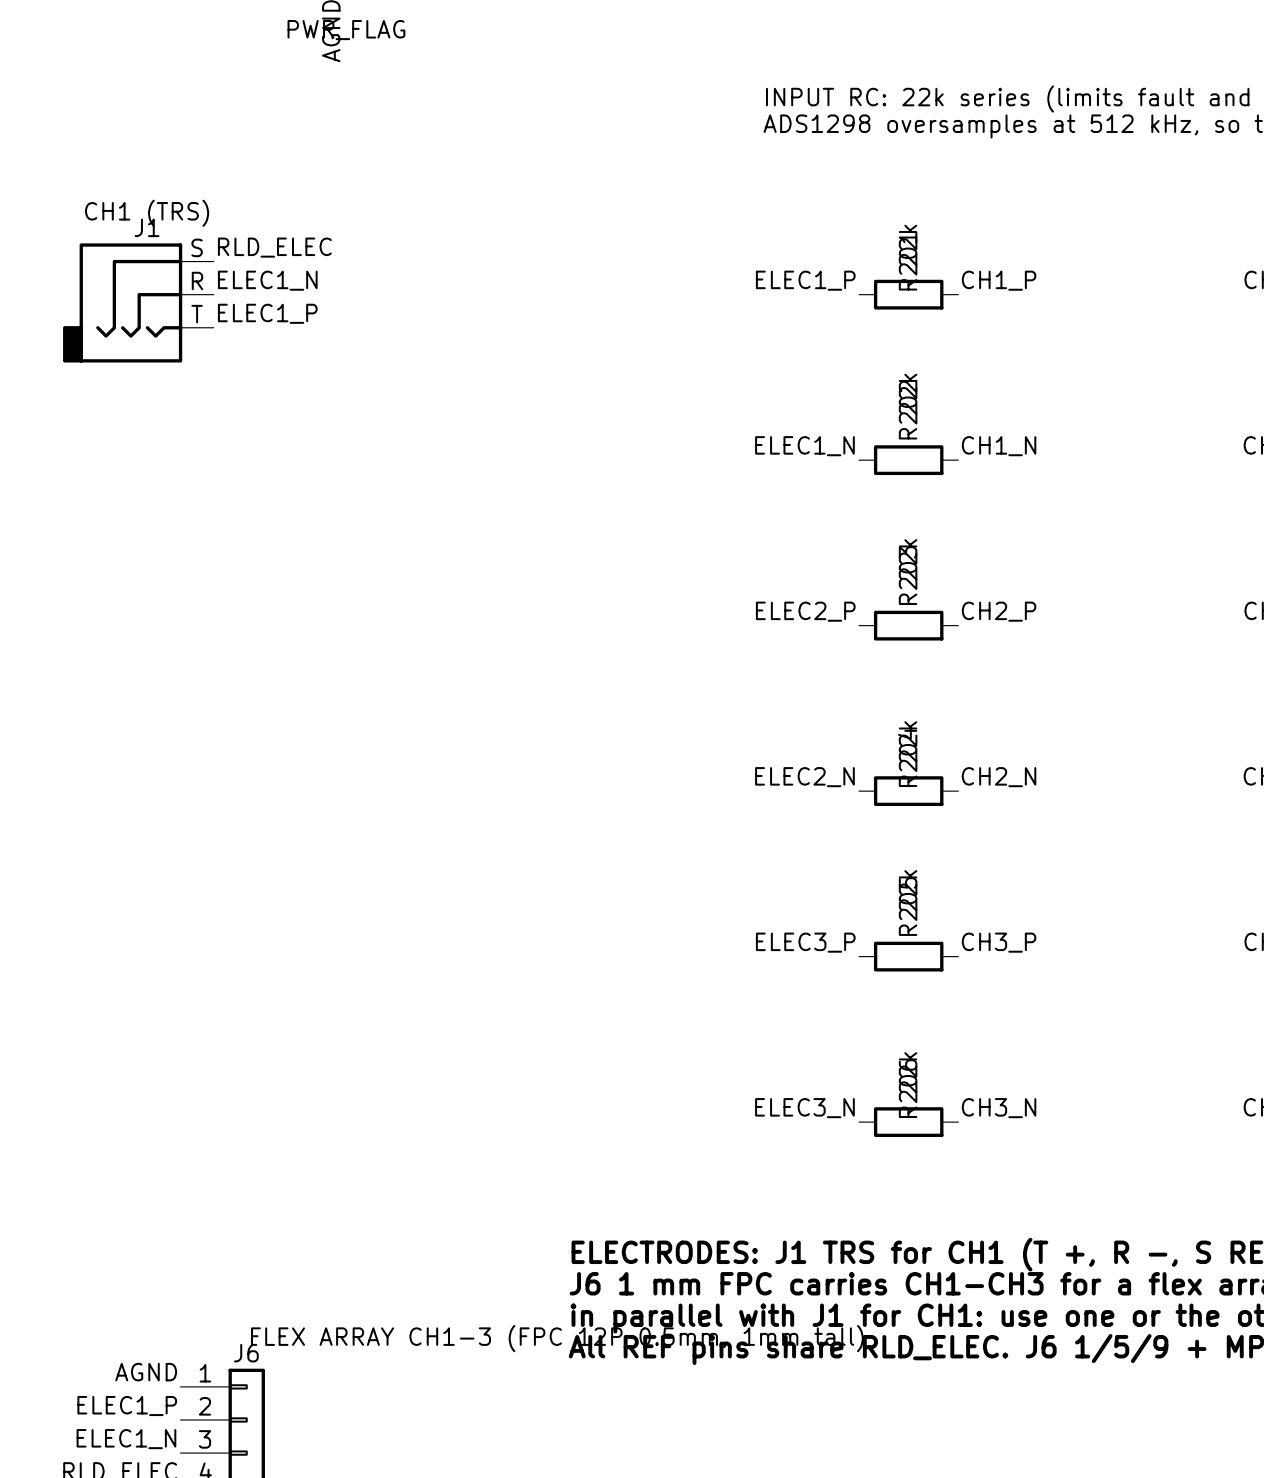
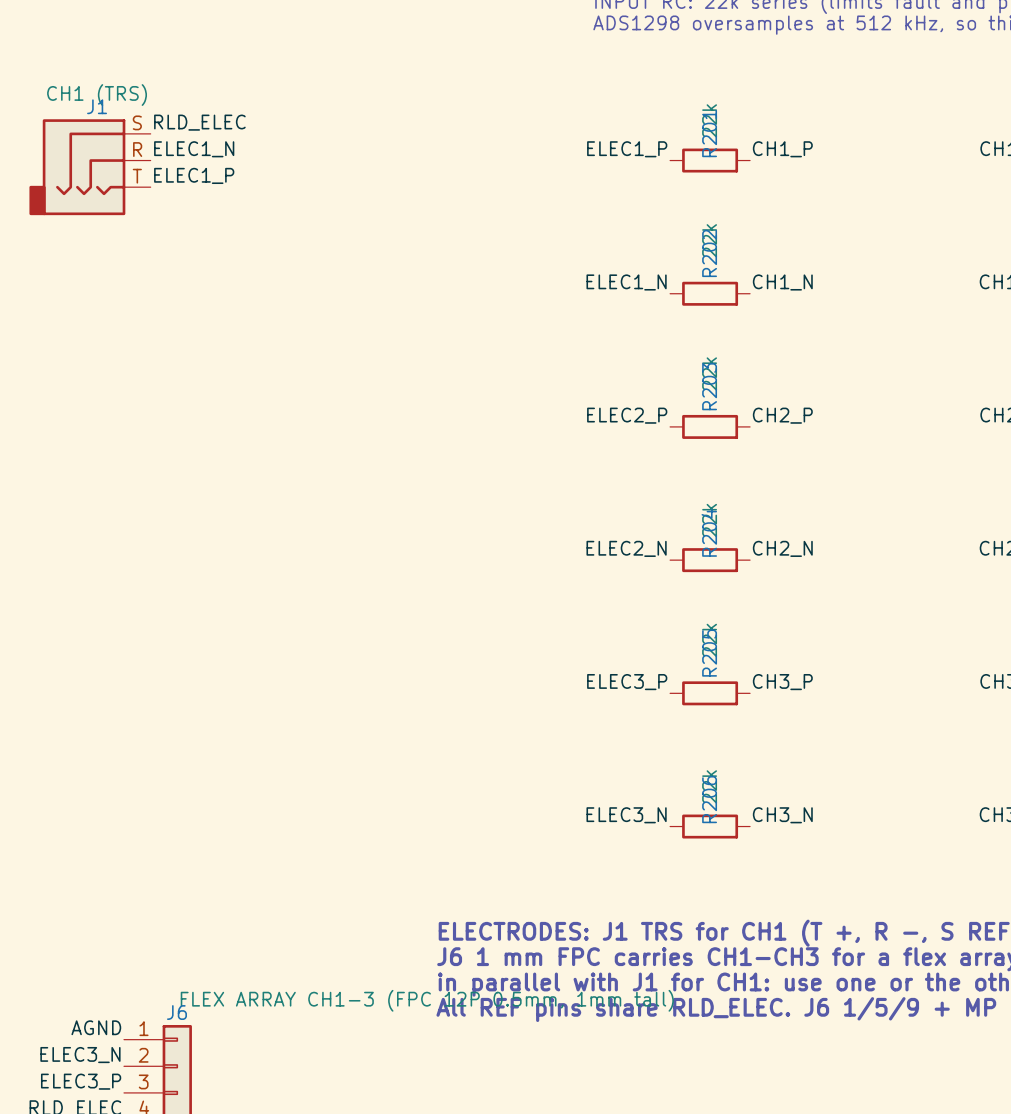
label: ELEC1_P (127, 1406) -> ELEC3_N (80, 1055)
label: ELEC1_N (126, 1439) -> ELEC3_P (81, 1081)

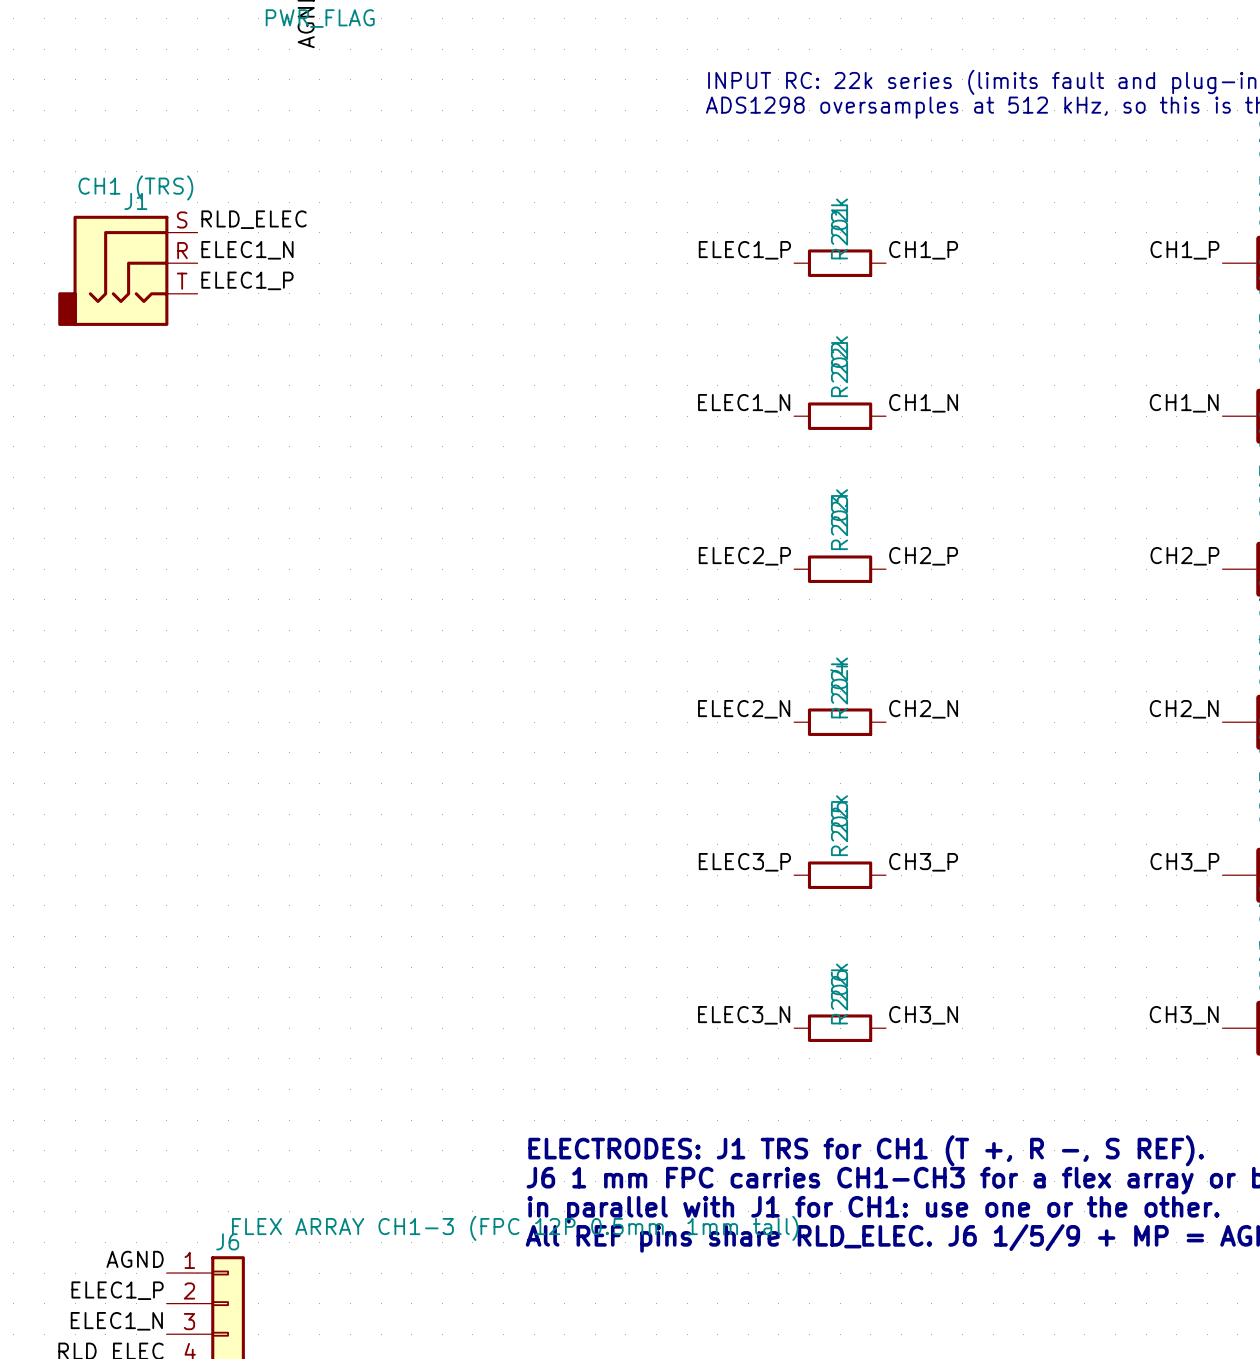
label: ELEC3_N (80, 1055) -> ELEC1_P (117, 1290)
label: ELEC3_P (81, 1081) -> ELEC1_N (116, 1321)

